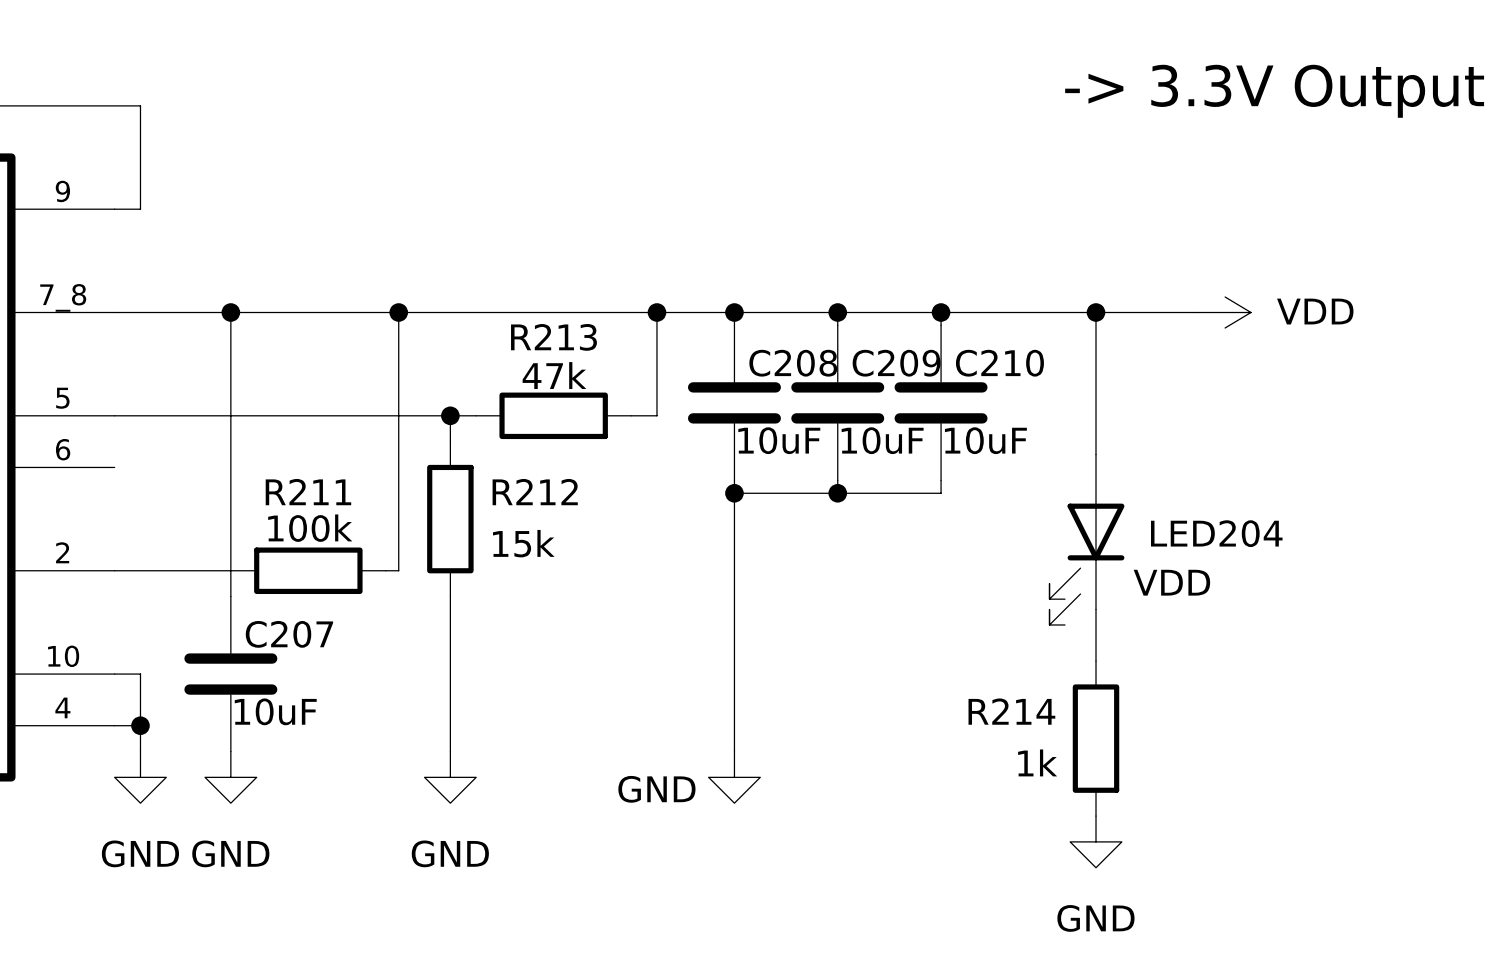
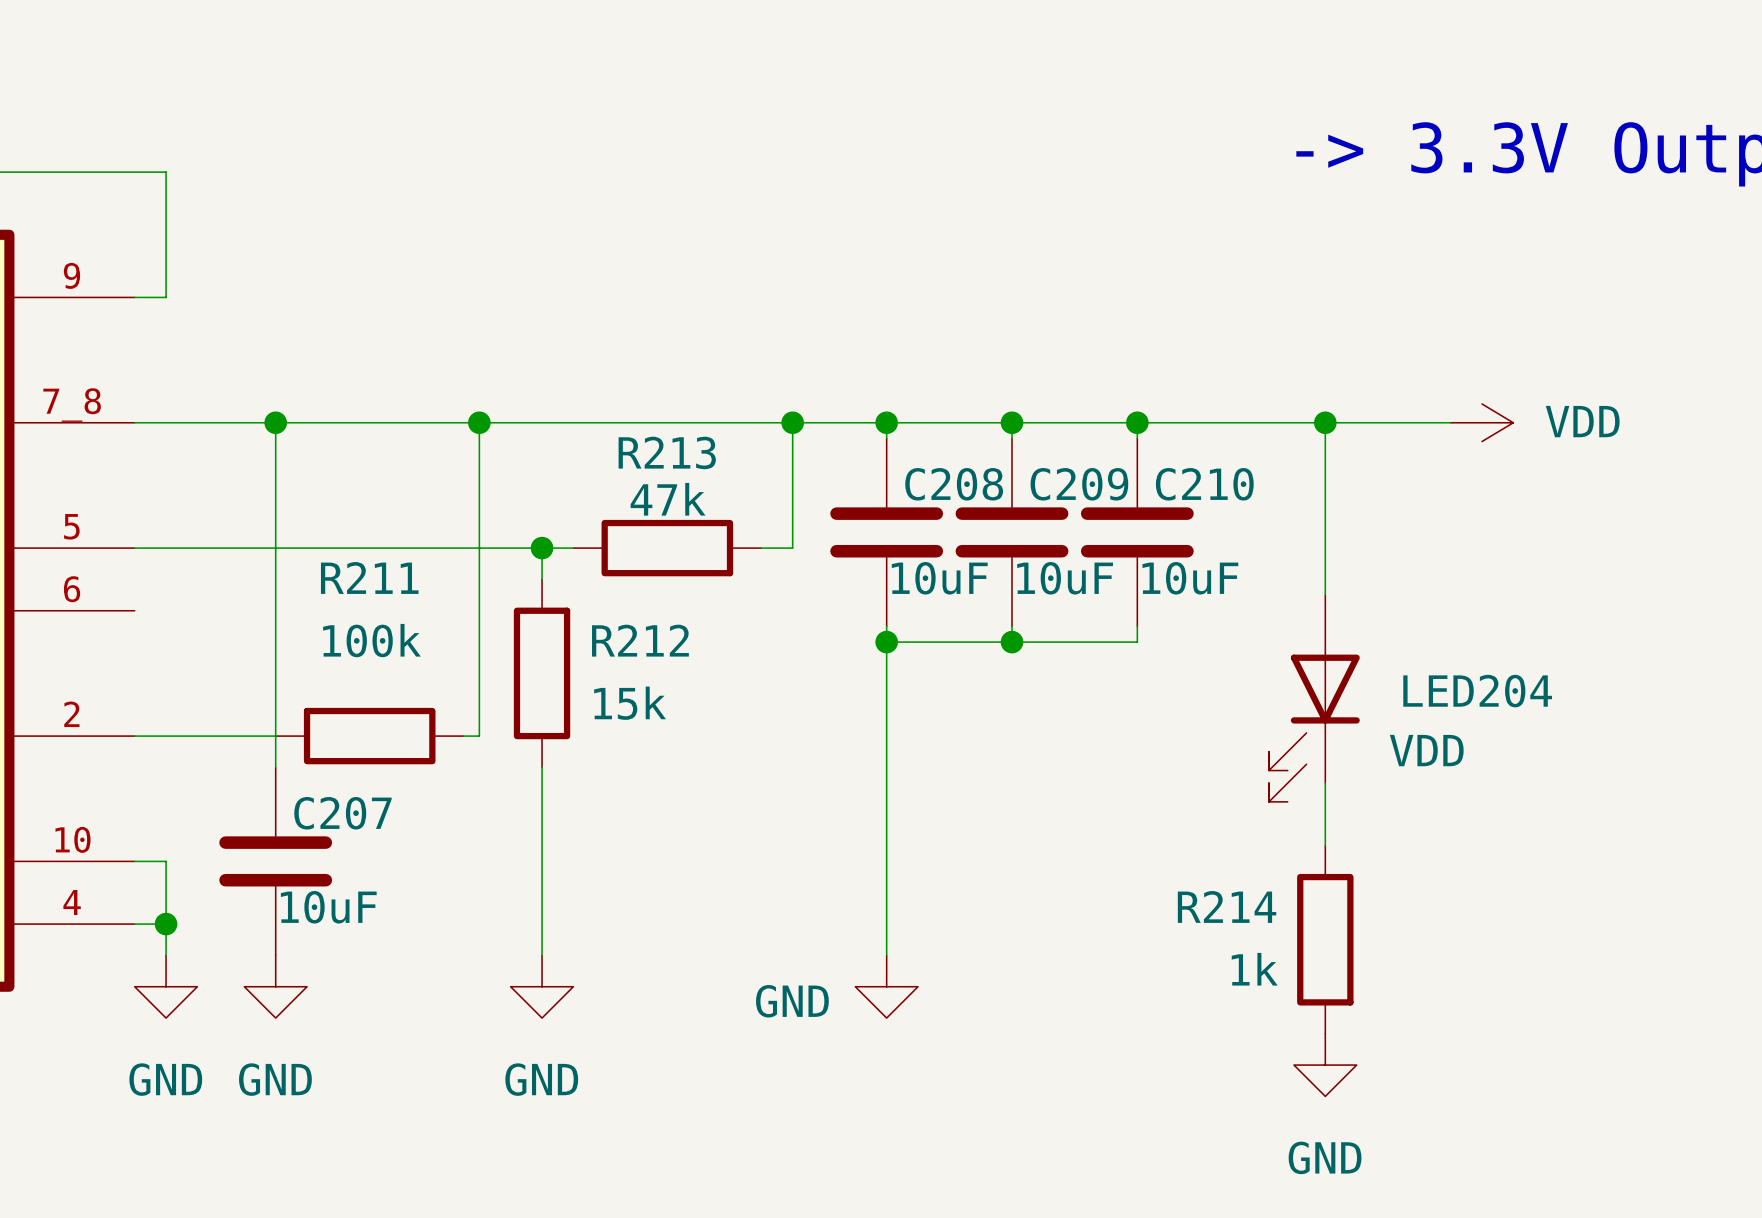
R211 name position: R211 (308, 492) -> R211 (369, 577)
R211 value position: 100k (310, 528) -> 100k (371, 640)

